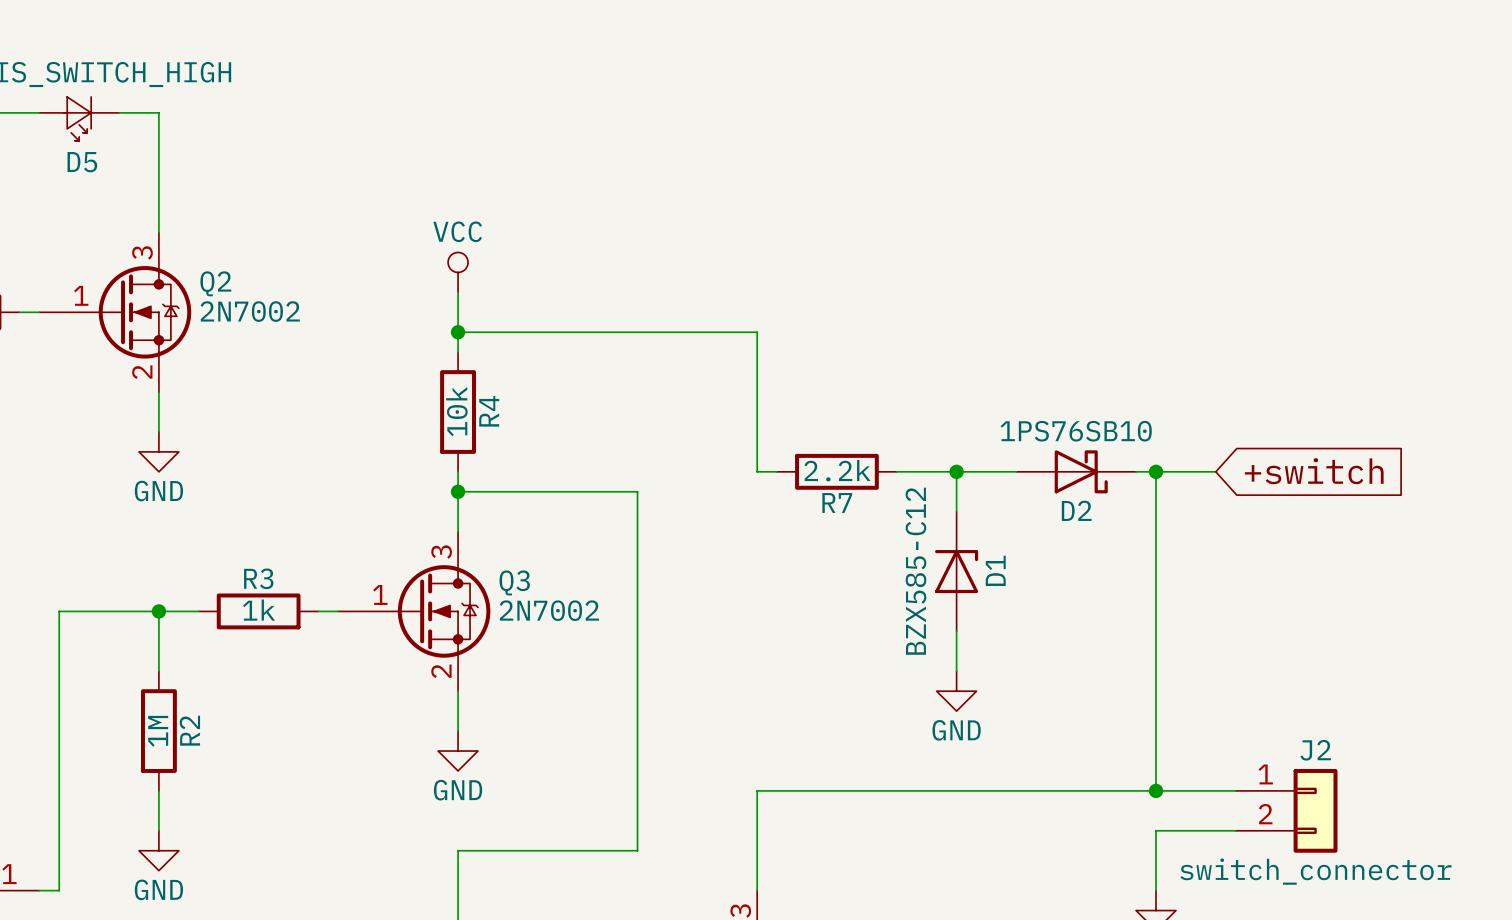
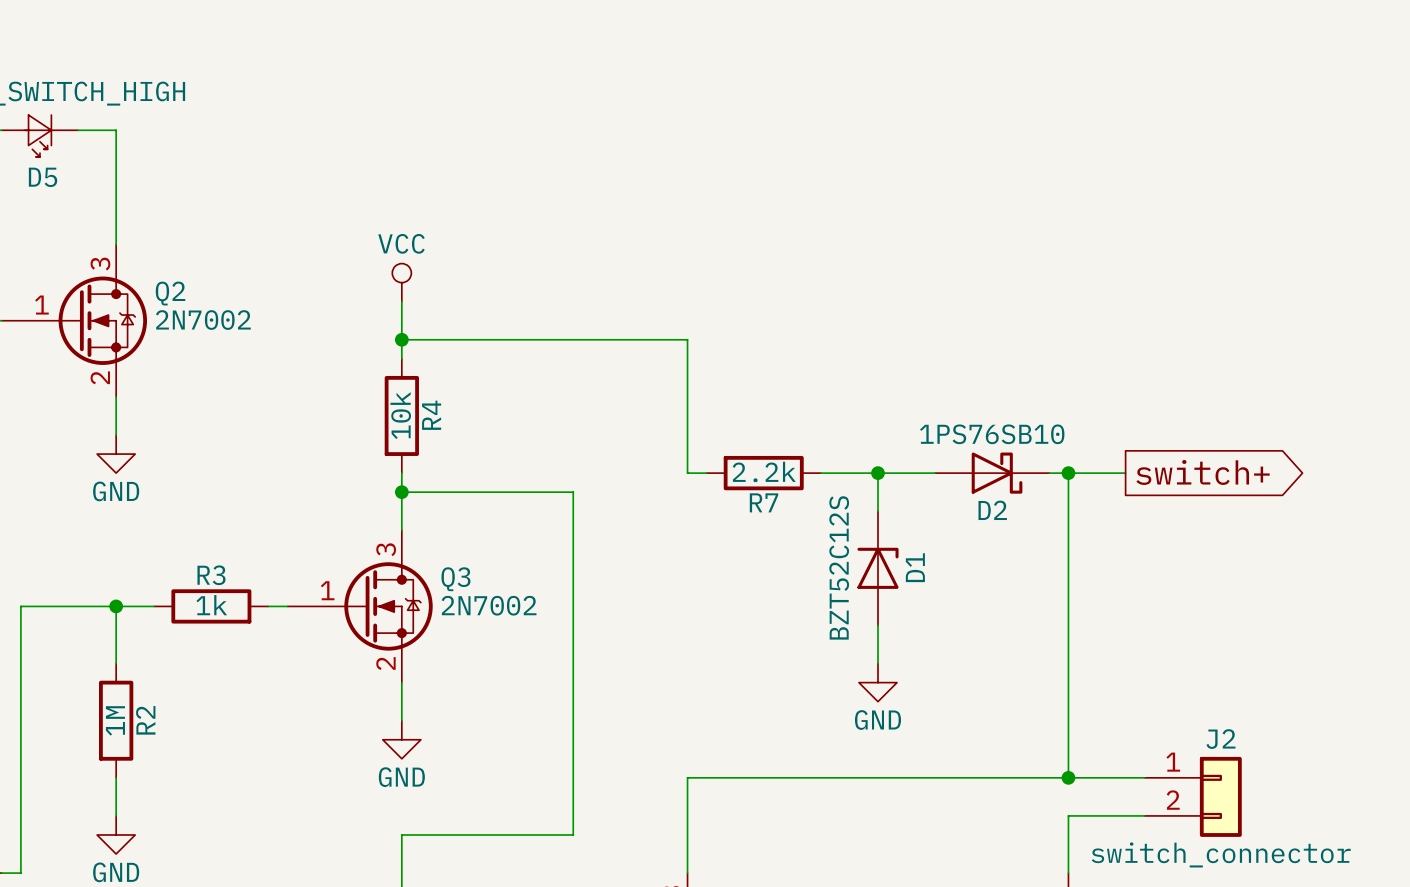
global label shape: input (1314, 471) -> output (1203, 472)
global label: +switch (1314, 471) -> switch+ (1203, 472)
D1 value: BZX585-C12 (915, 571) -> BZT52C12S (839, 567)

